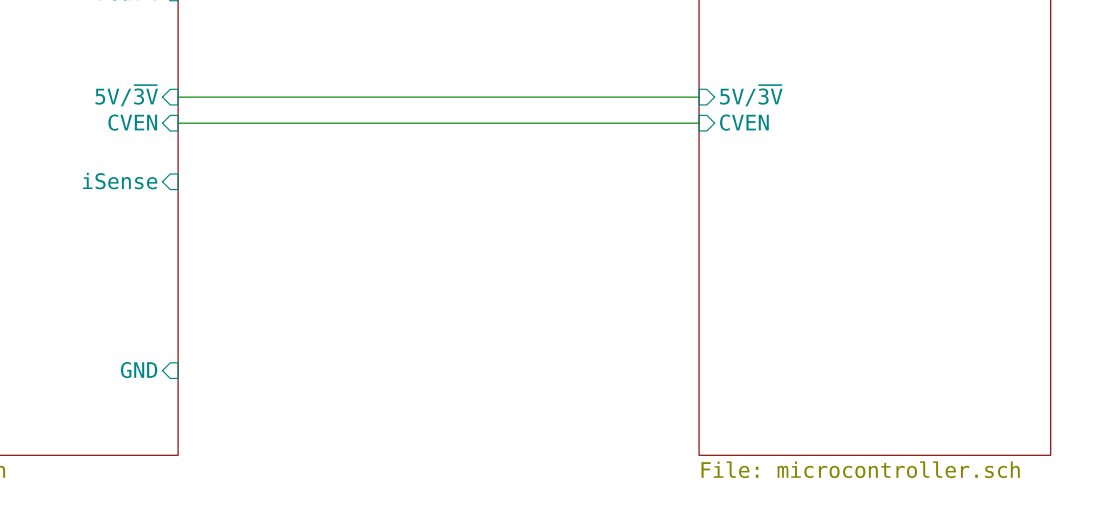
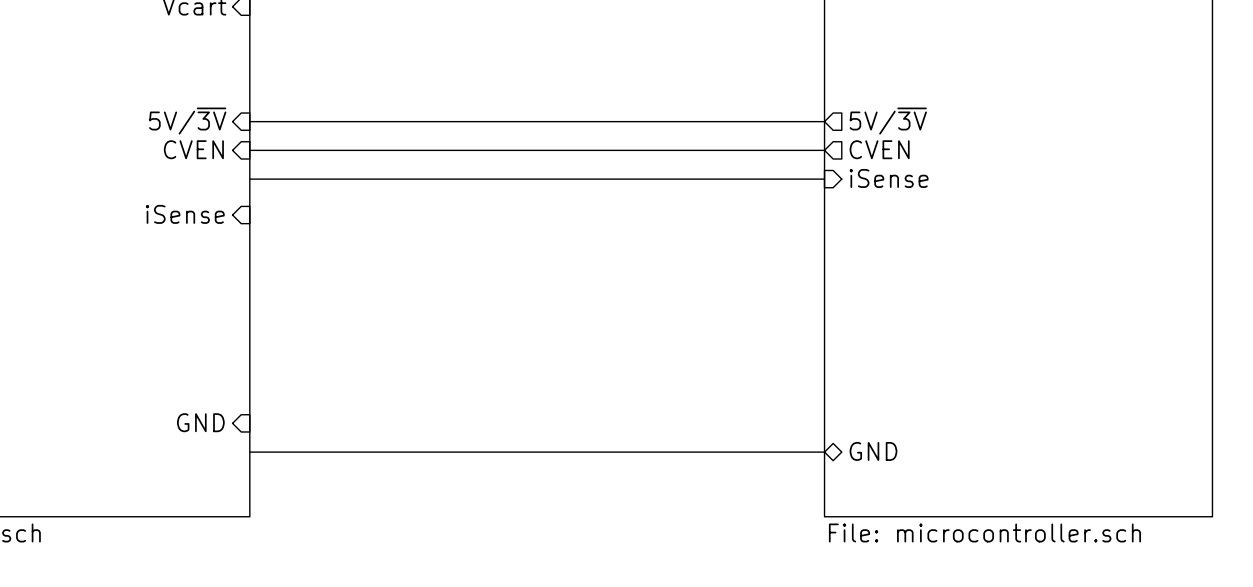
sheet pin shape: input (751, 95) -> output (888, 121)
sheet pin shape: input (744, 122) -> output (879, 149)
sheet pin: none -> iSense (889, 178)
wire: none -> (249, 179) (824, 179)
wire: none -> (249, 452) (824, 452)
sheet pin: none -> GND (873, 451)

